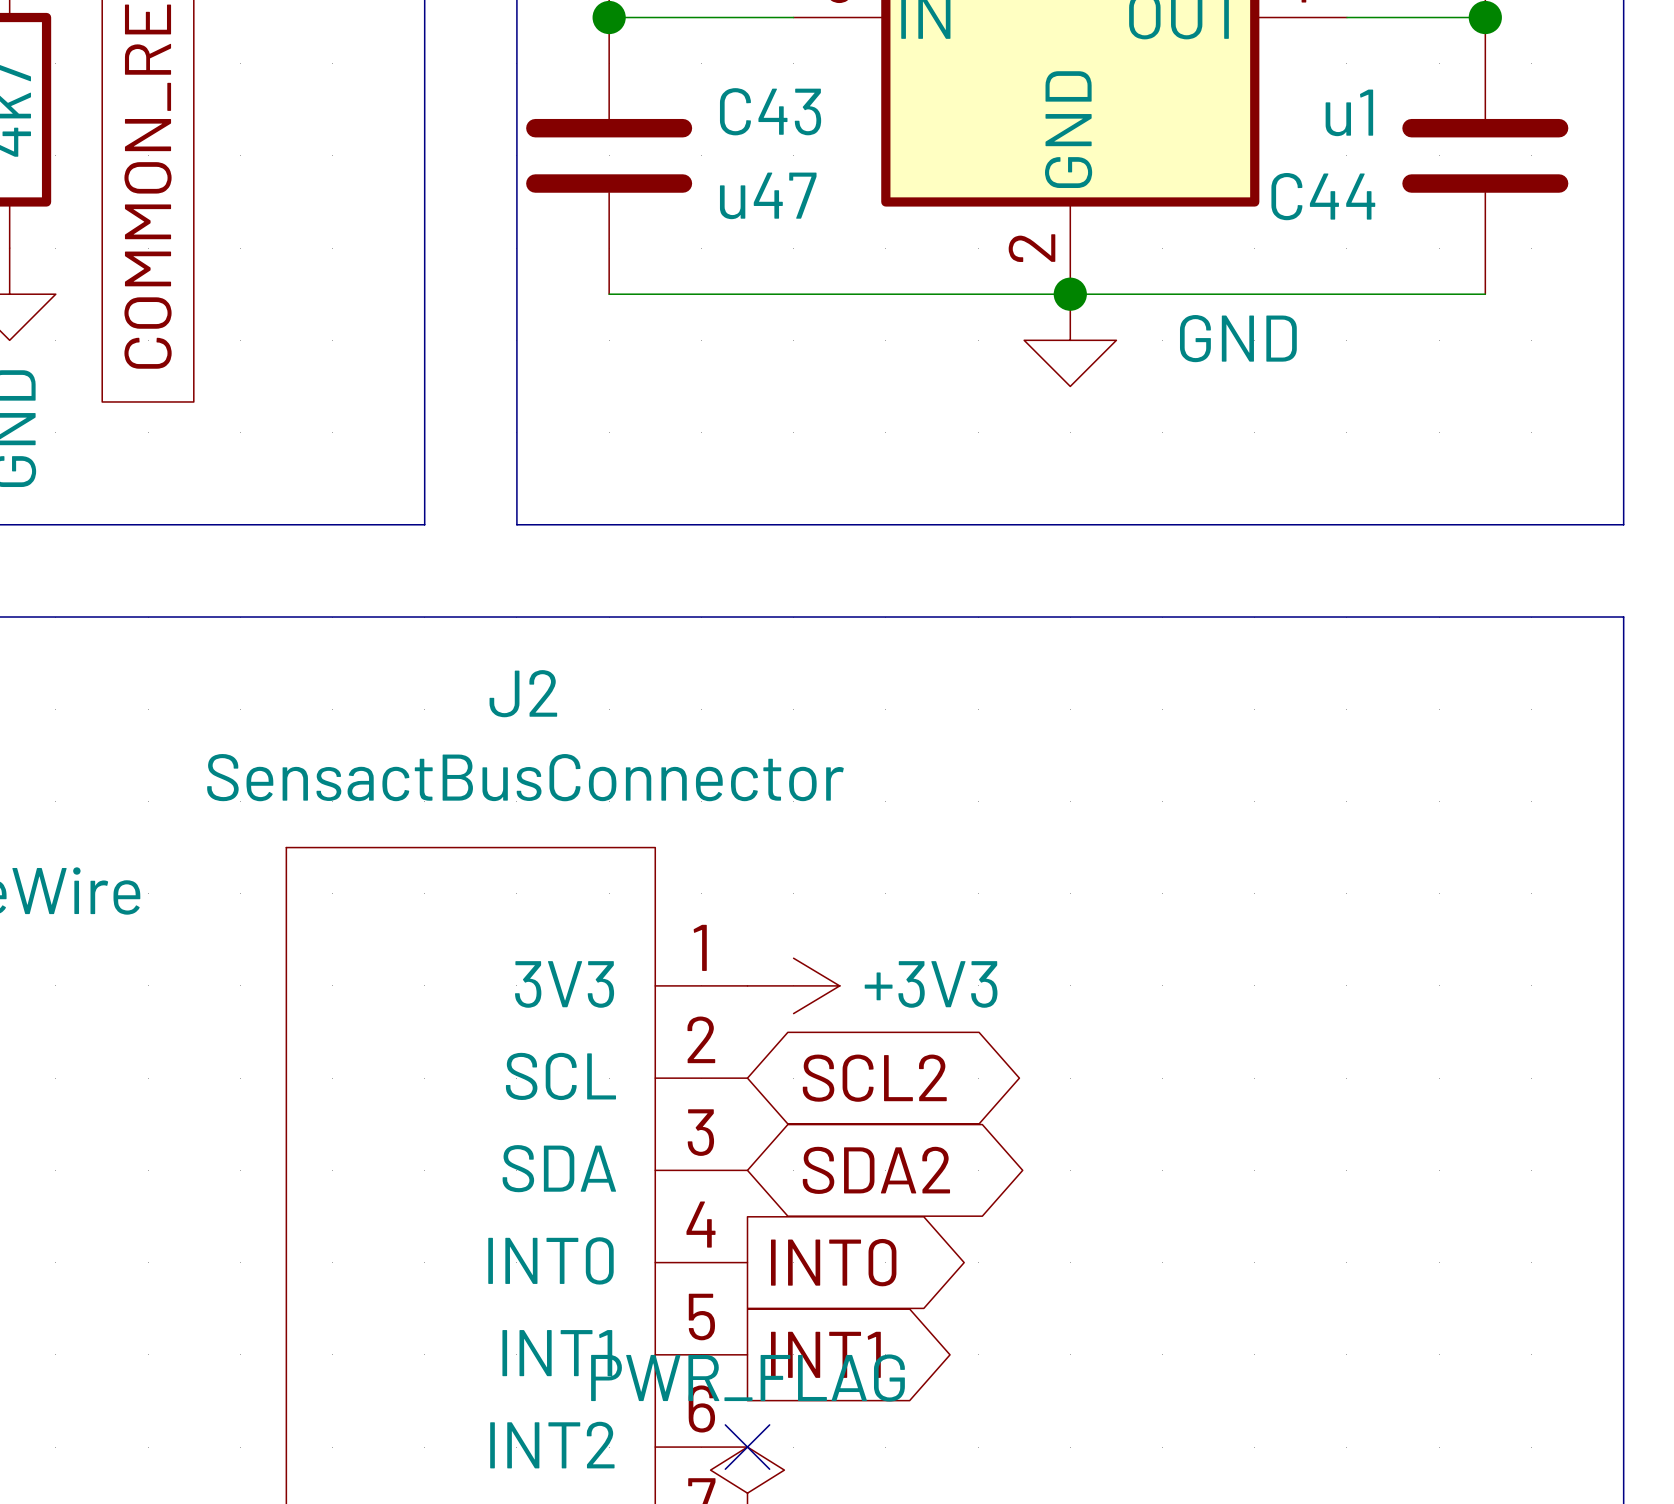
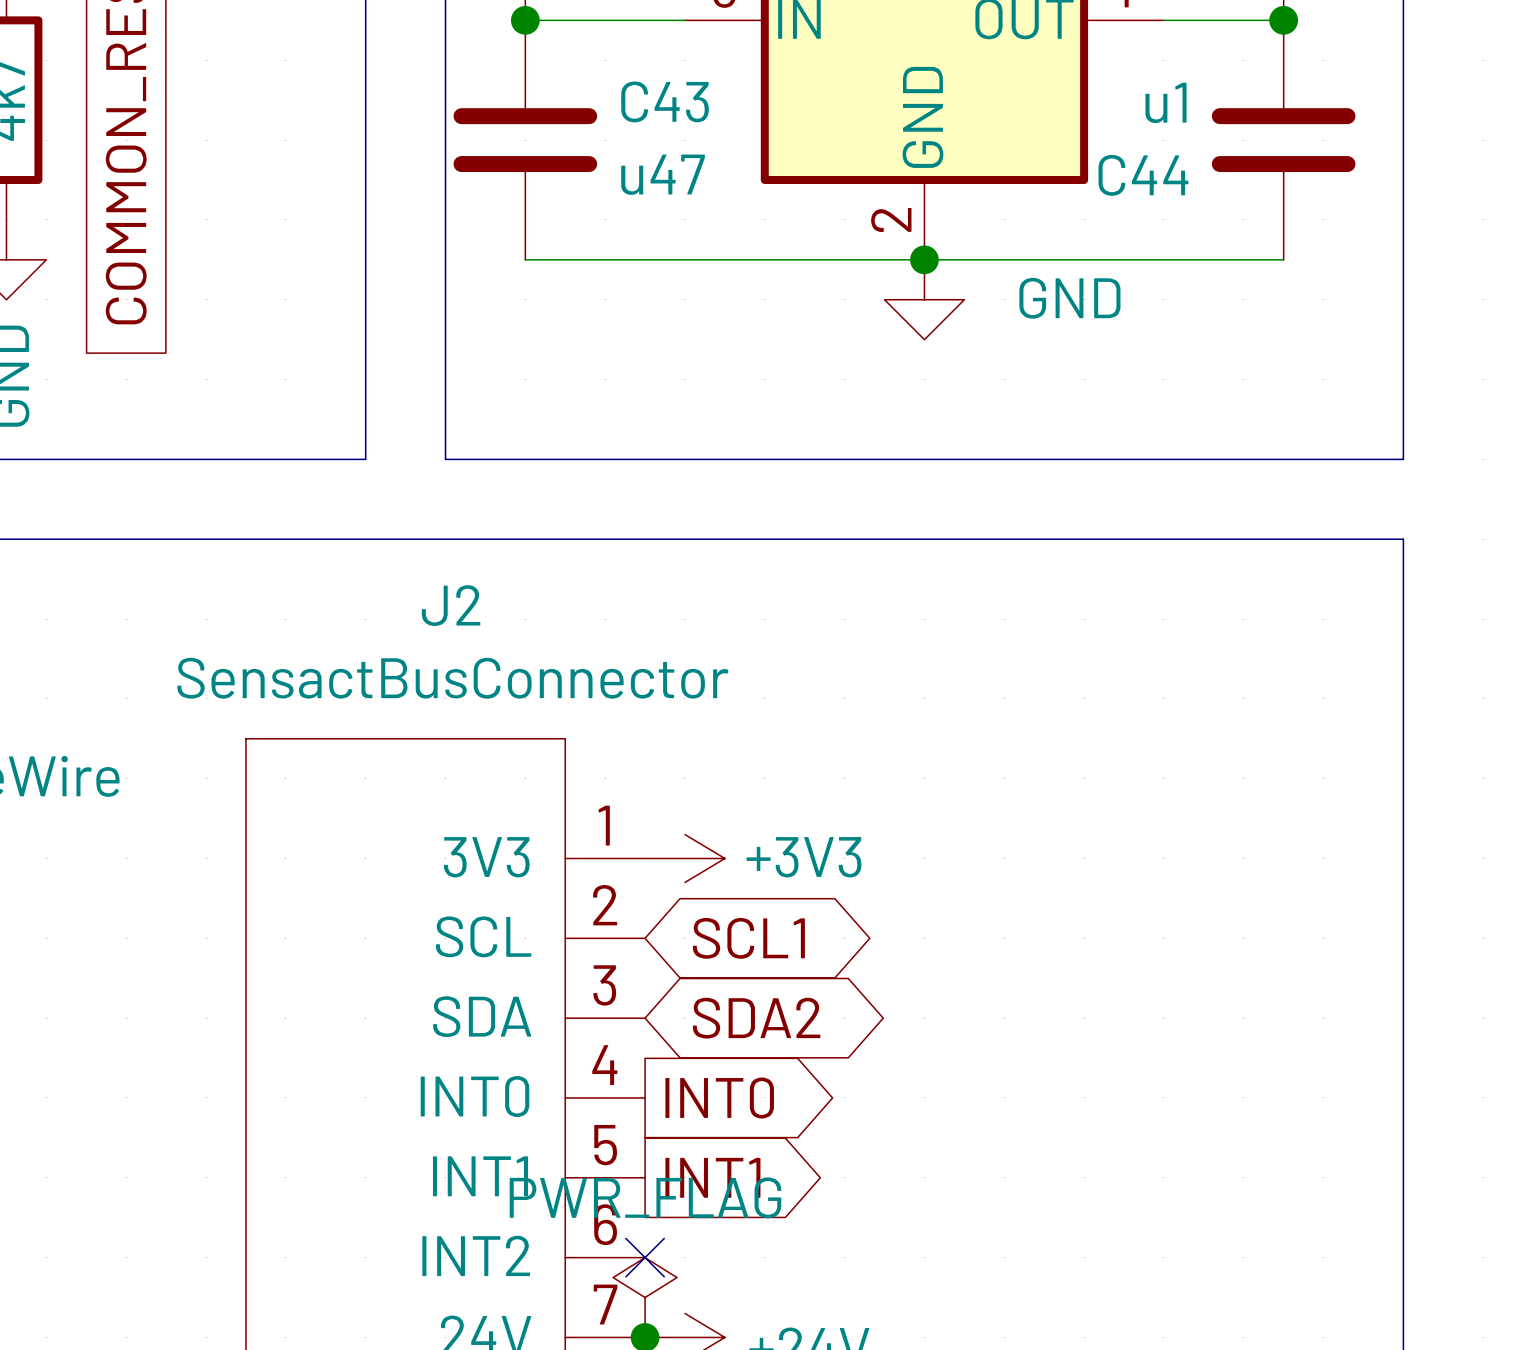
global label: SCL2 (874, 1078) -> SCL1 (748, 938)

